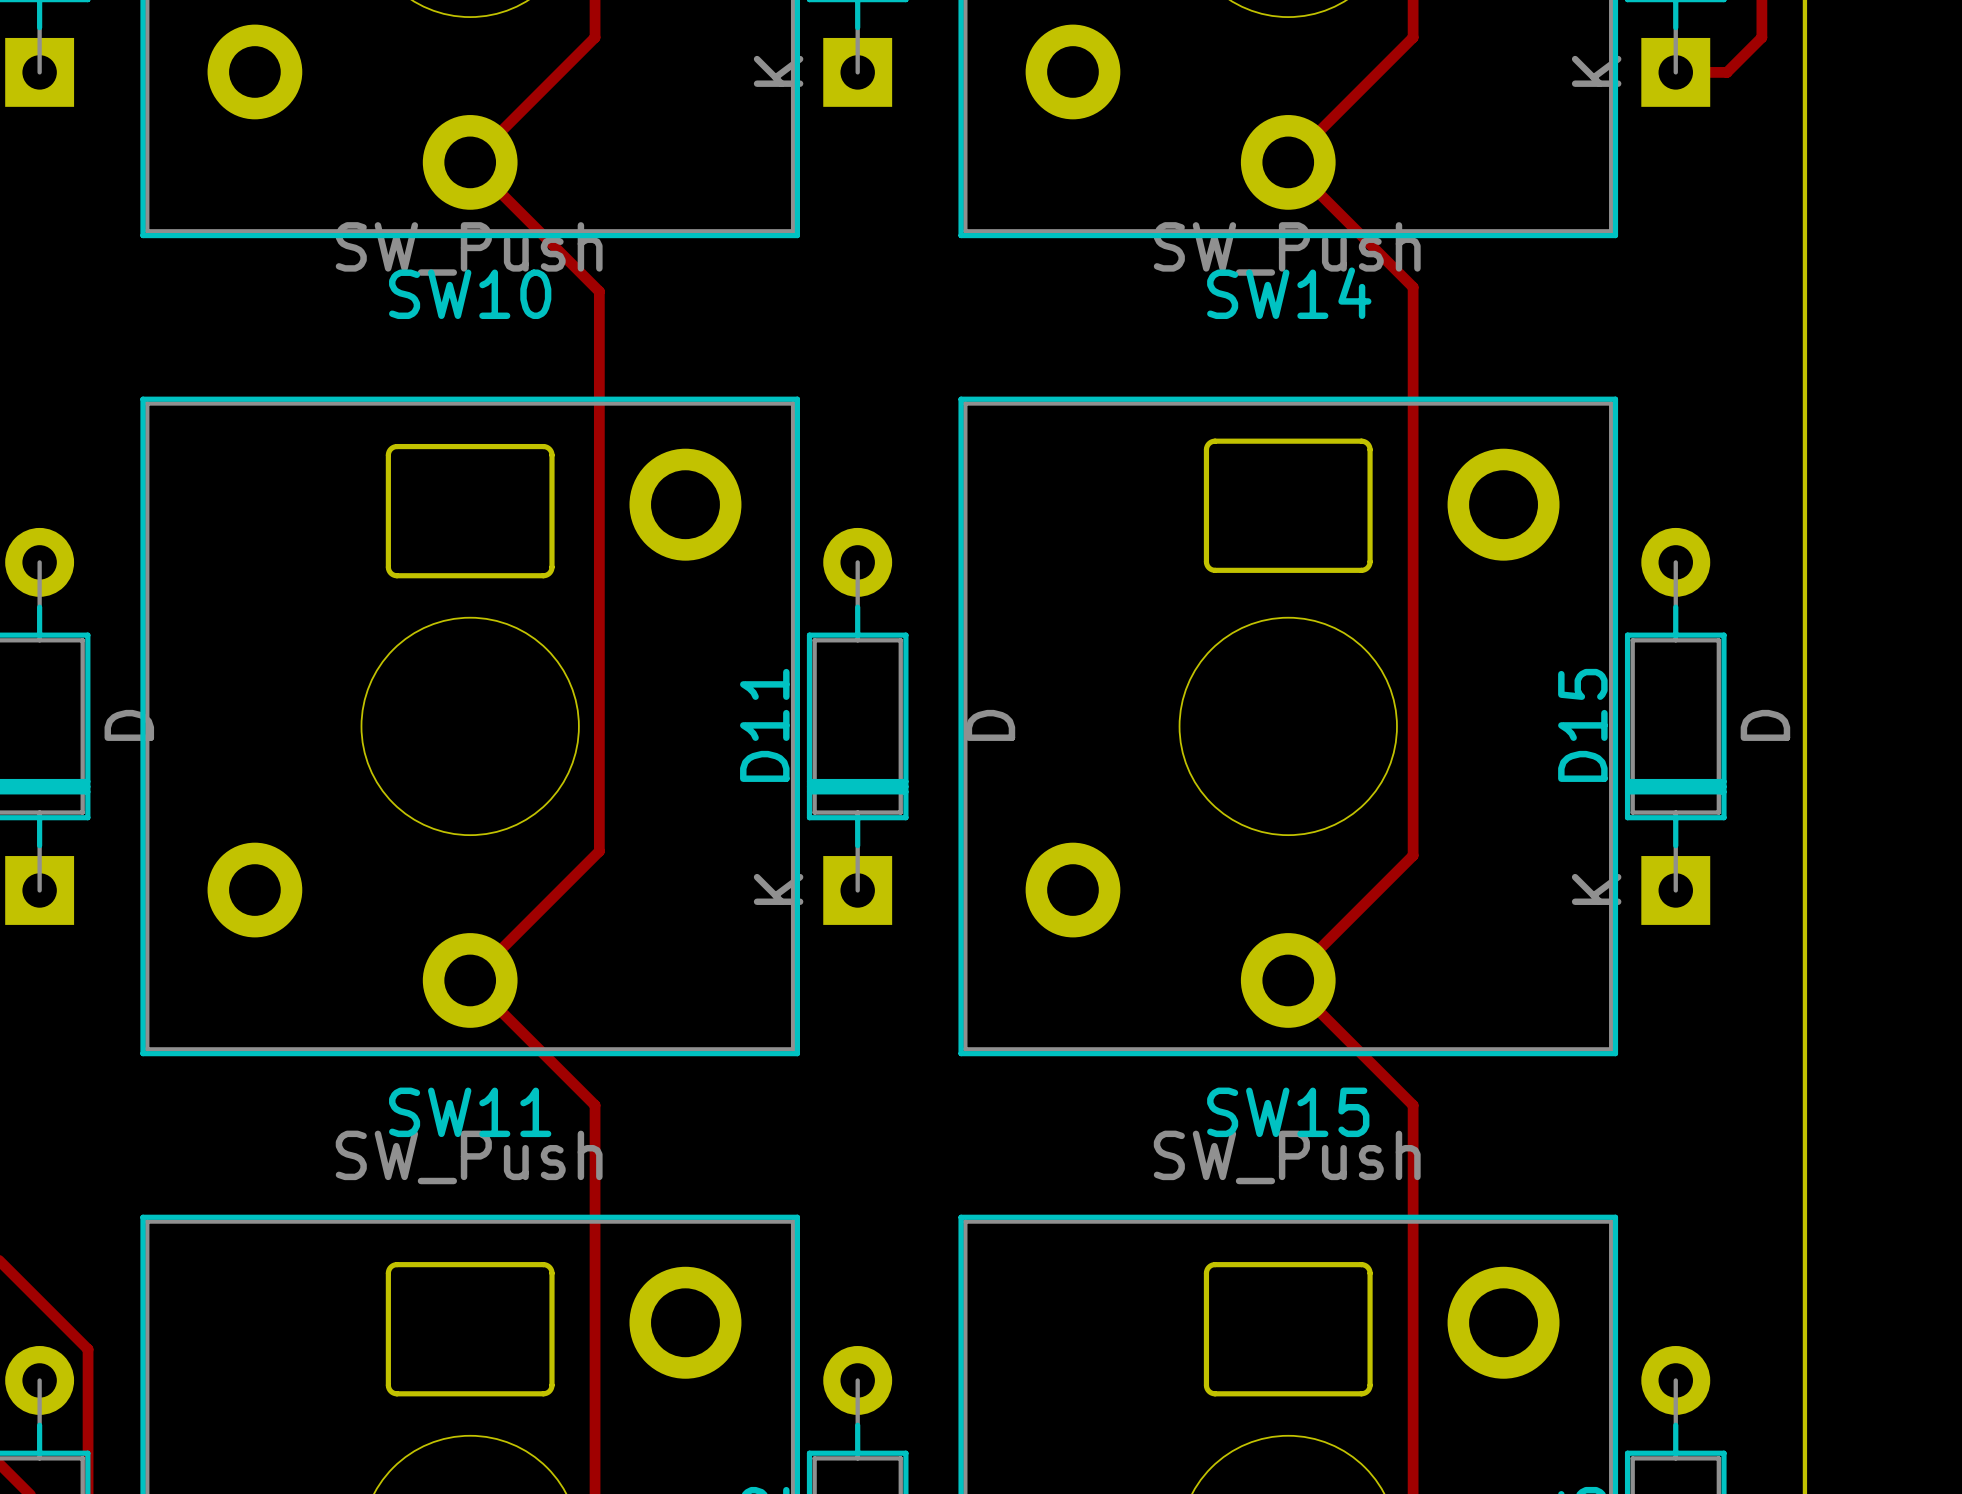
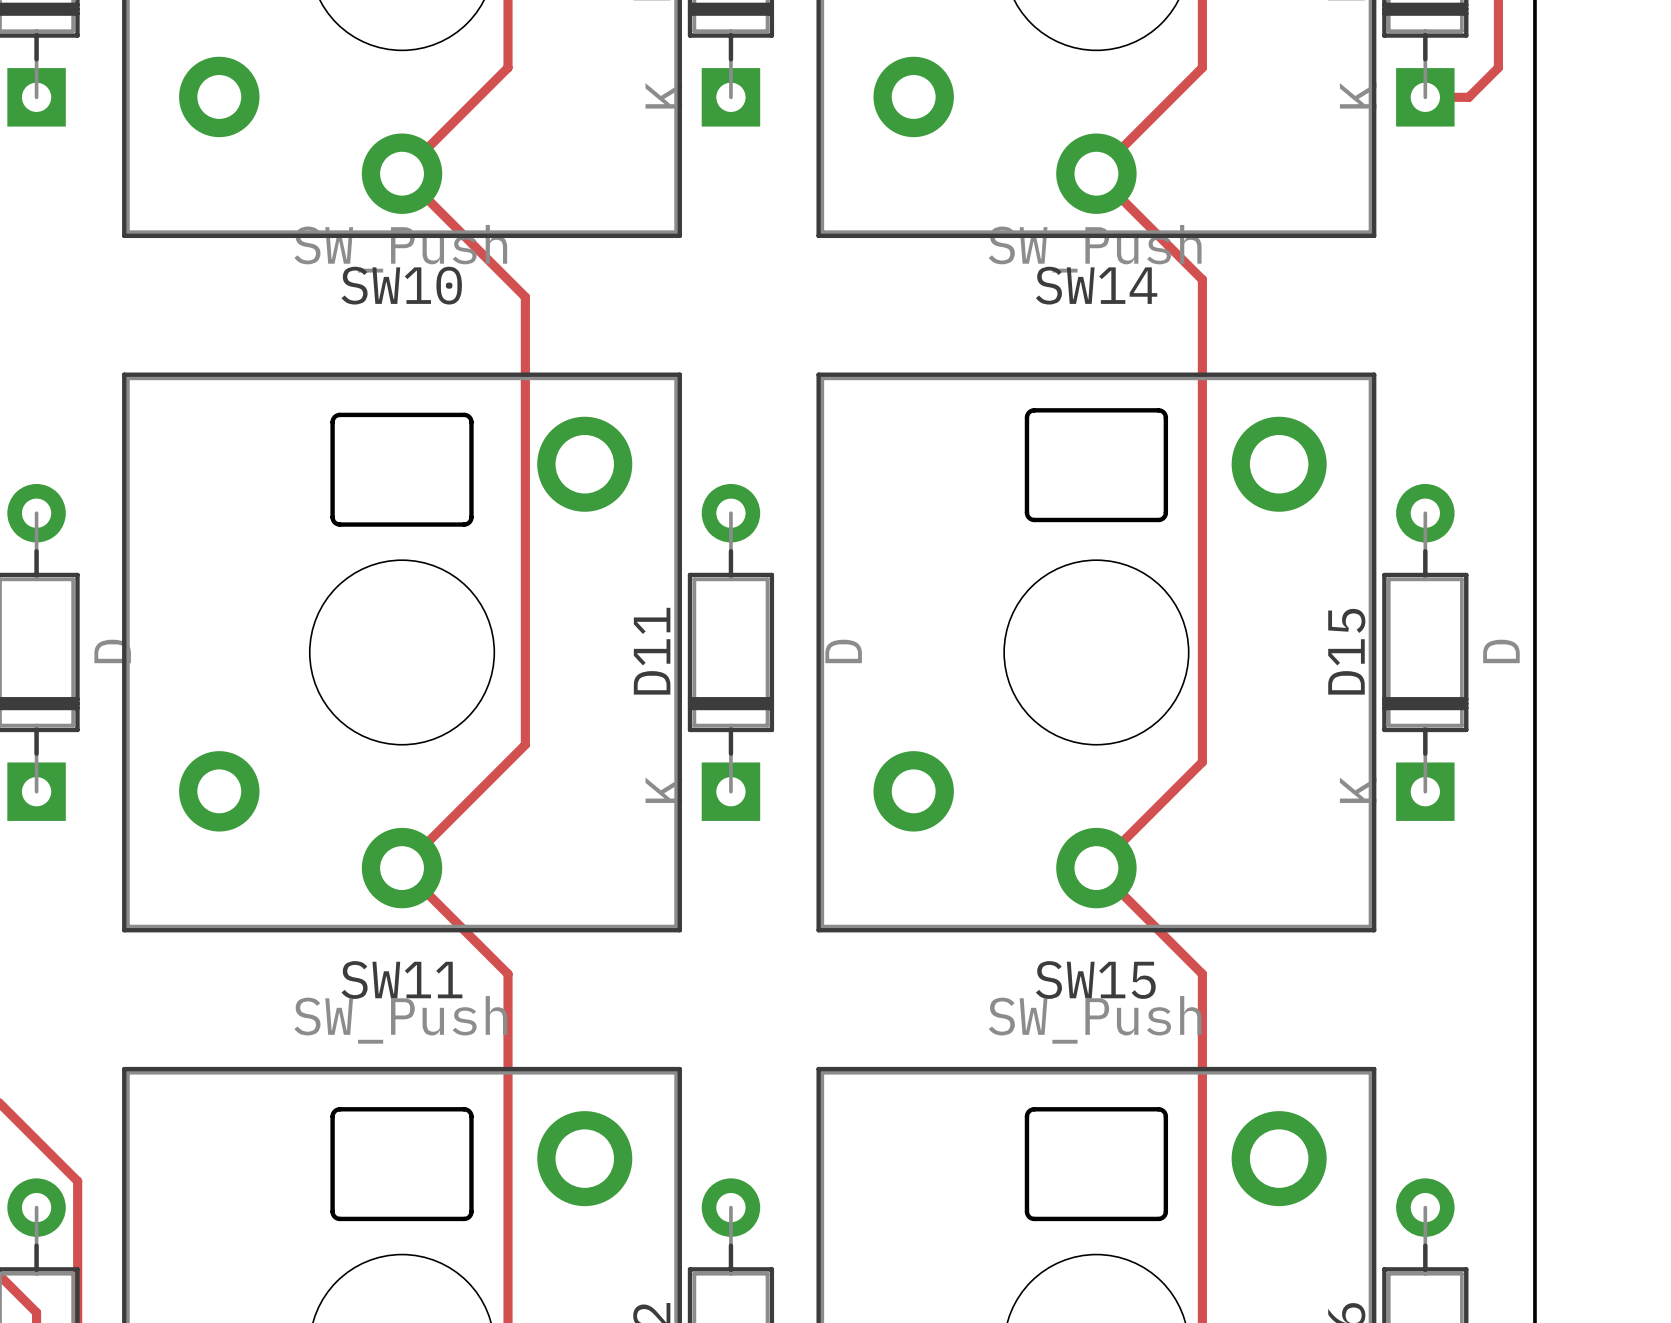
track: (599, 291) (599, 851) -> (511, 283) (525, 297) (525, 744) (511, 758)

